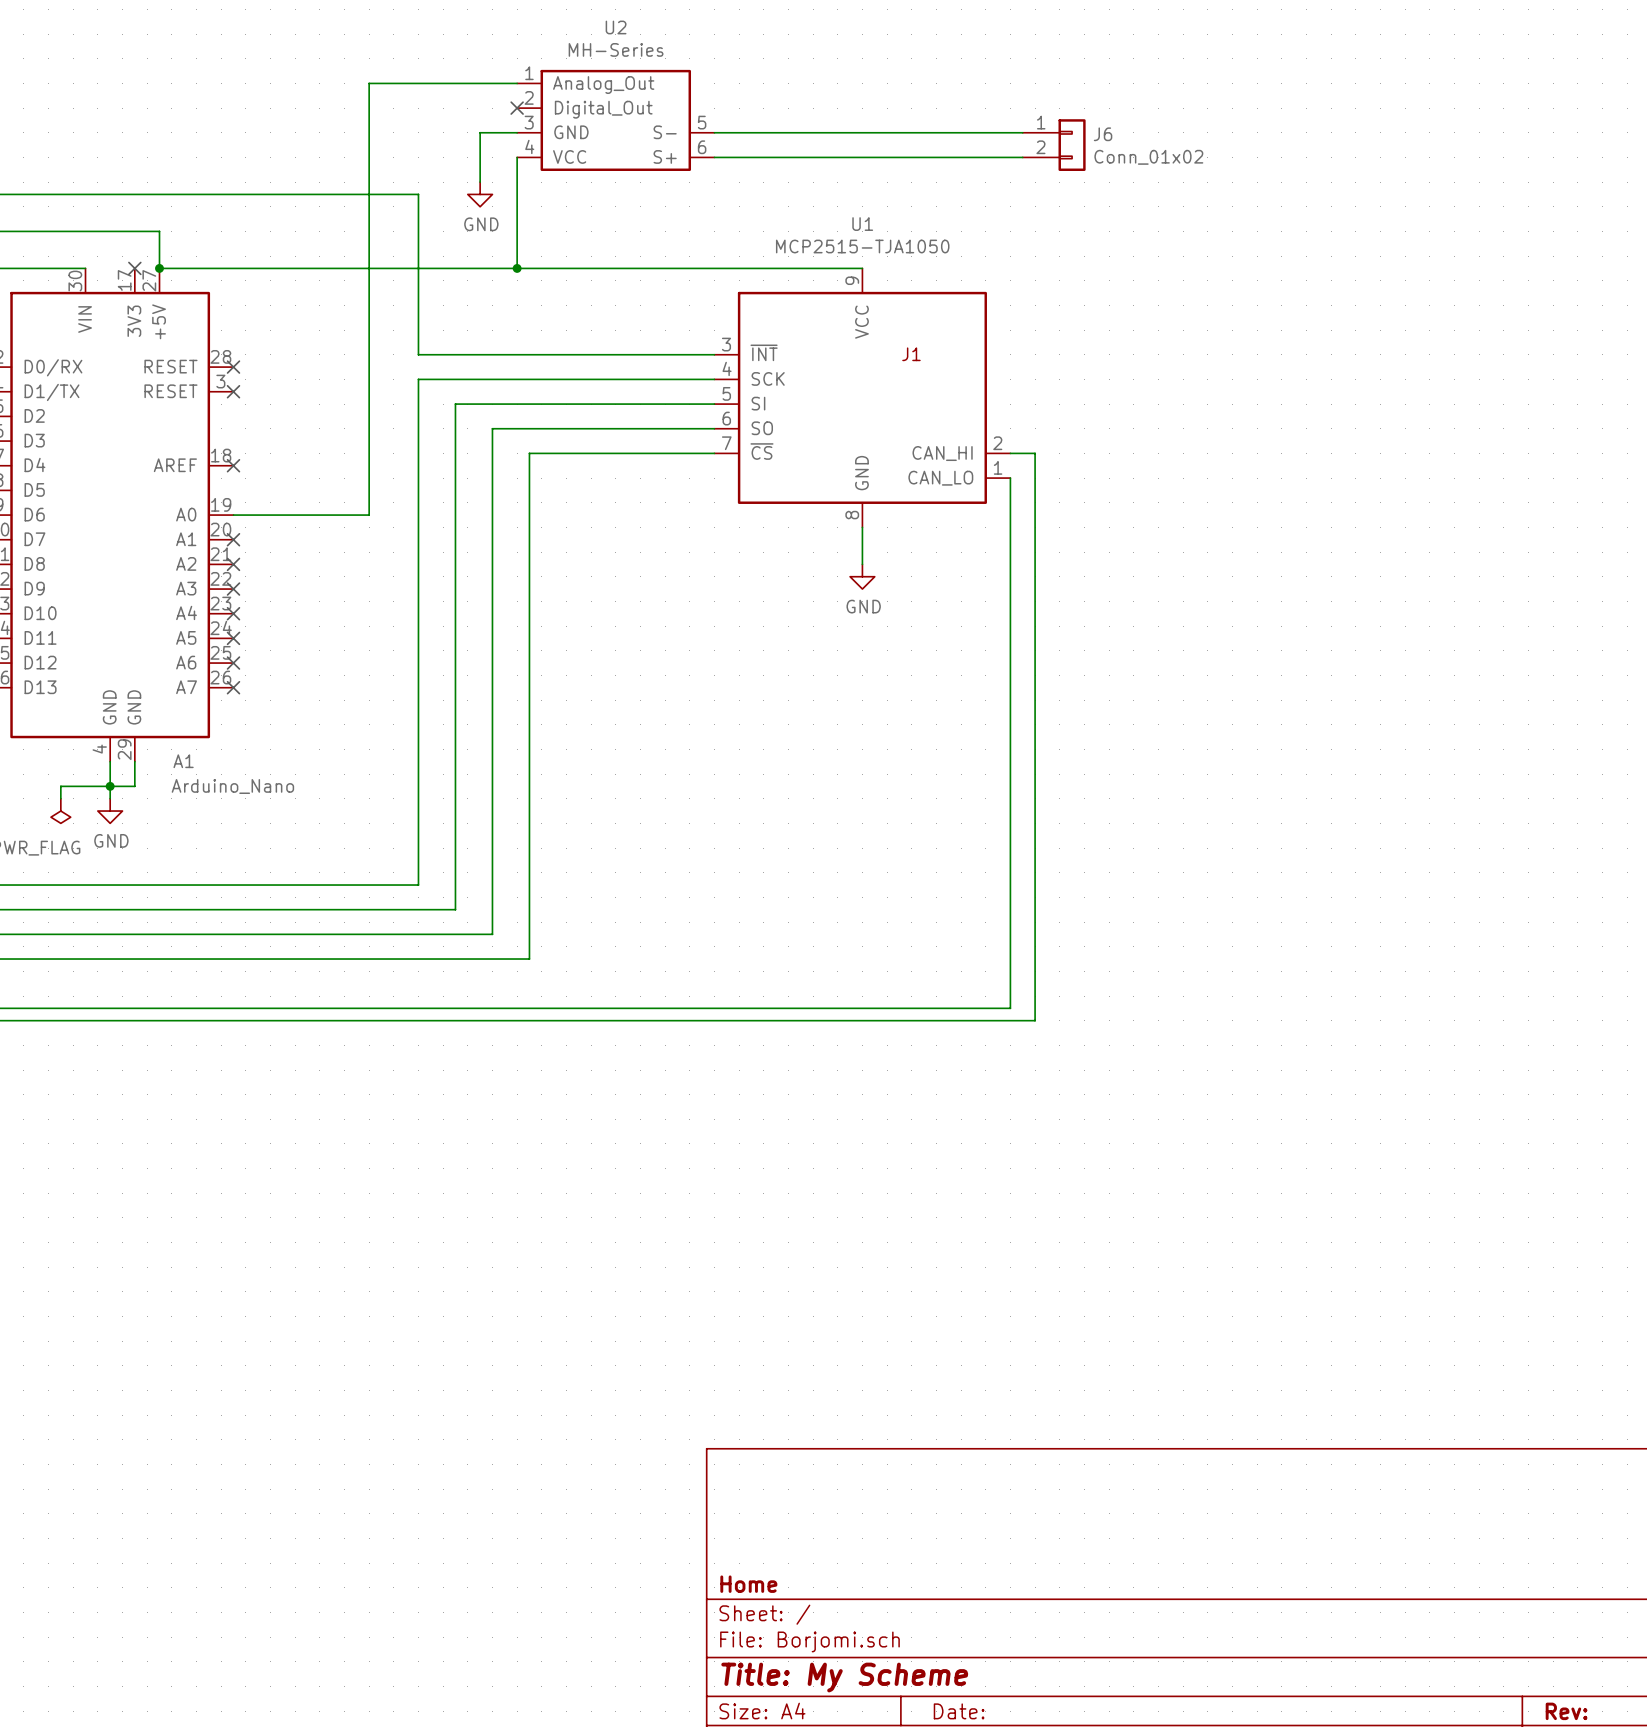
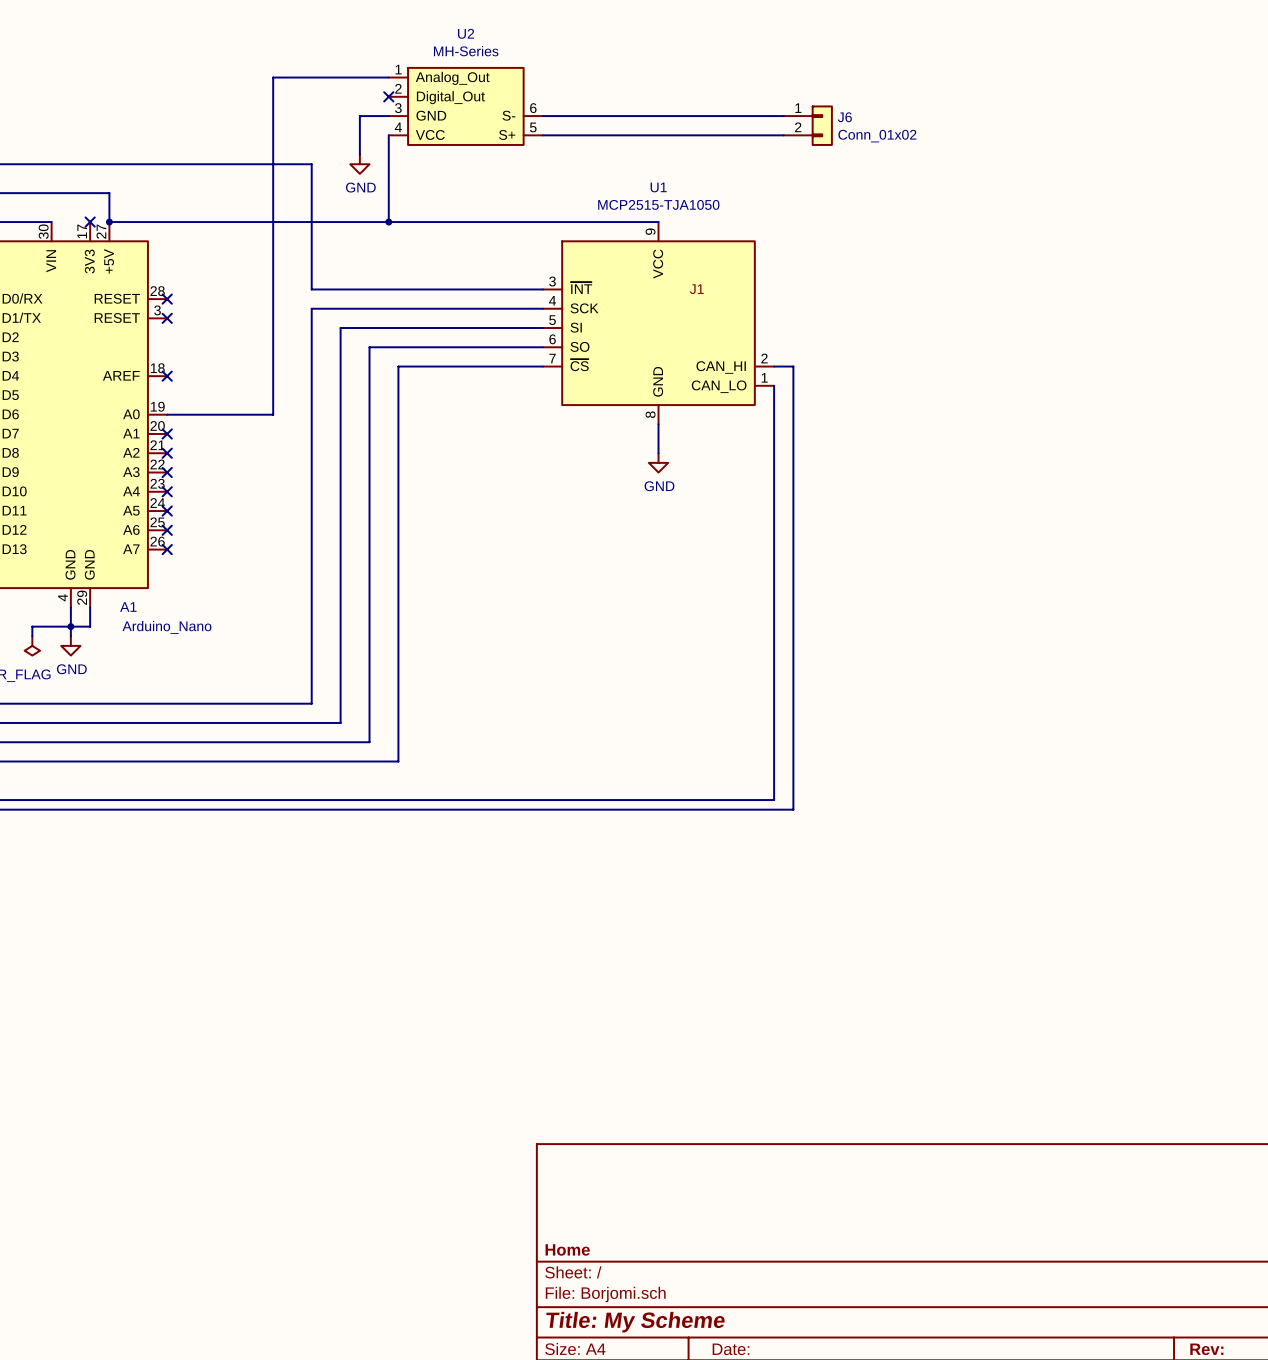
U2 pin number: 5 (702, 122) -> 6 (533, 108)
U2 pin number: 6 (702, 147) -> 5 (533, 127)

